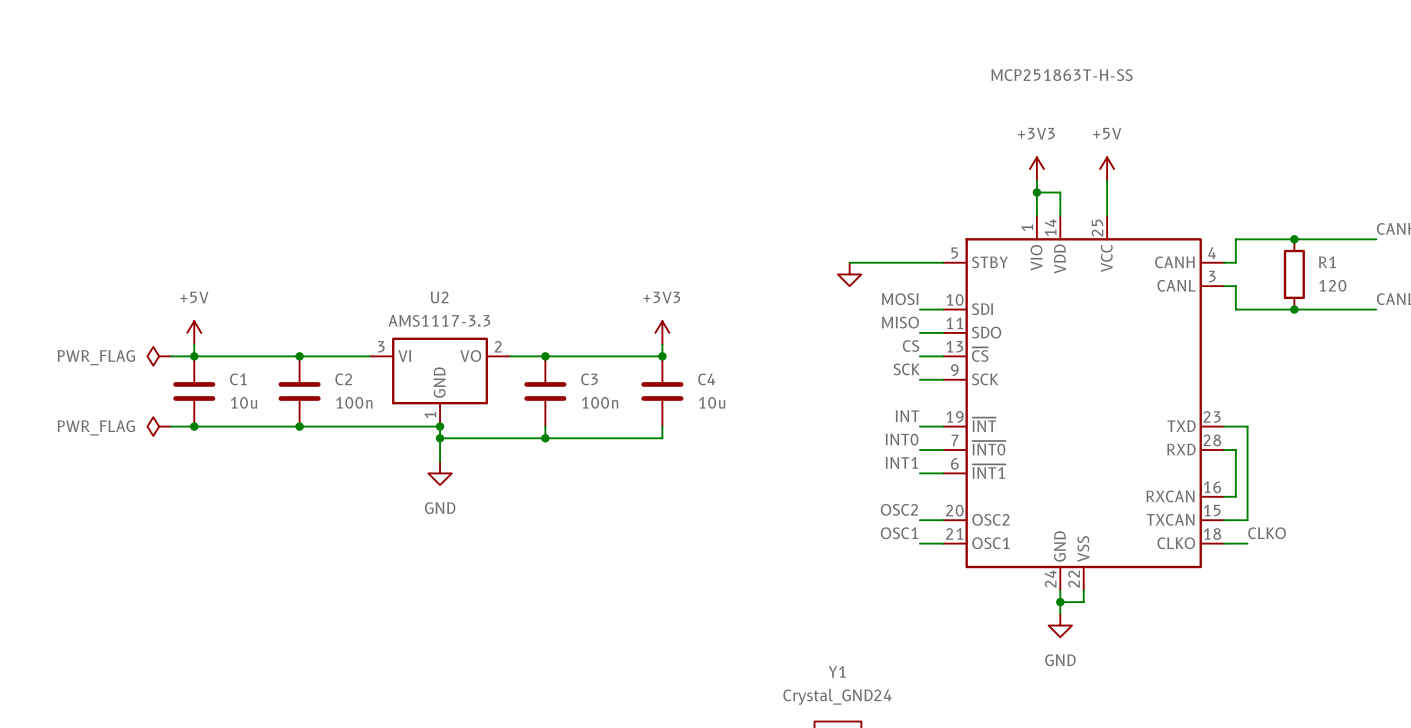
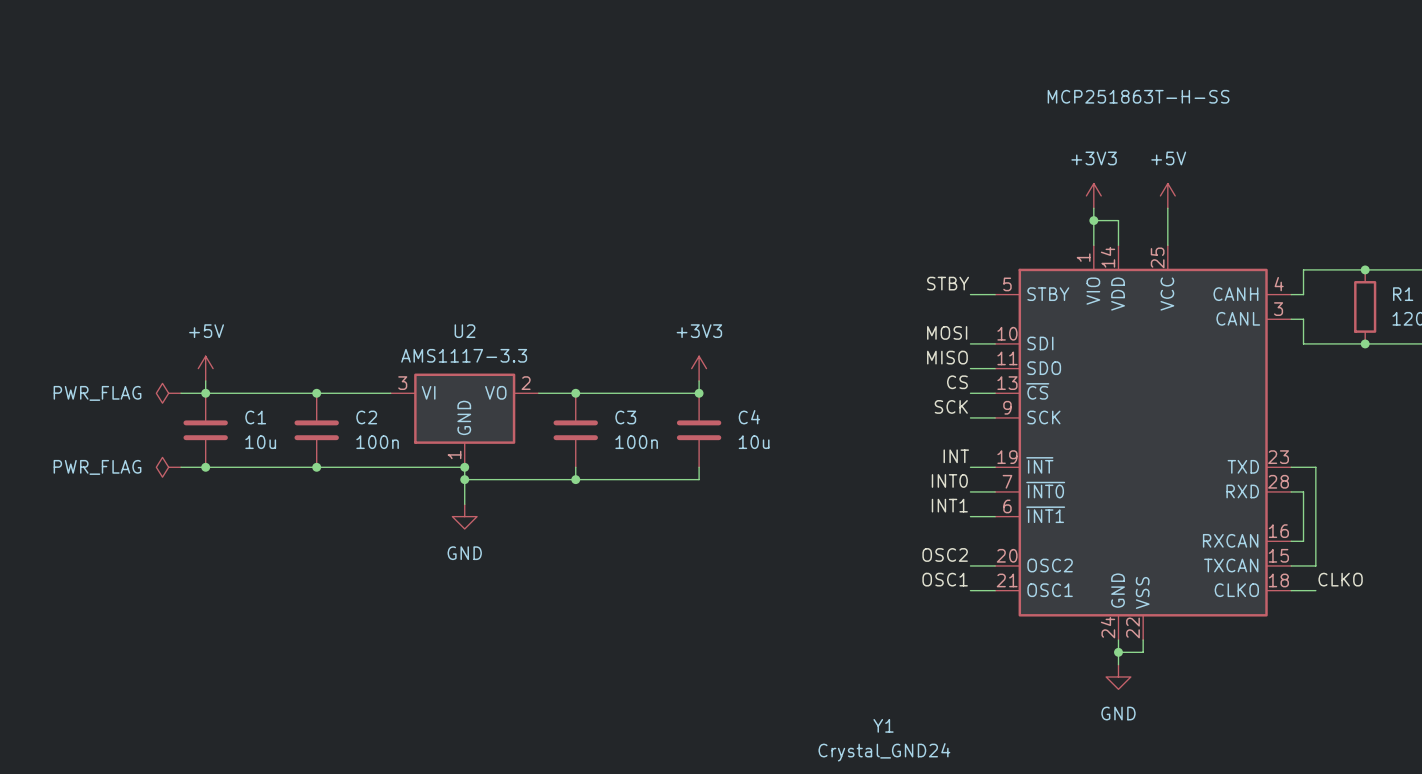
label: none -> STBY (948, 283)
wire: (849, 262) (919, 262) -> none
power symbol: (849, 274) -> none

